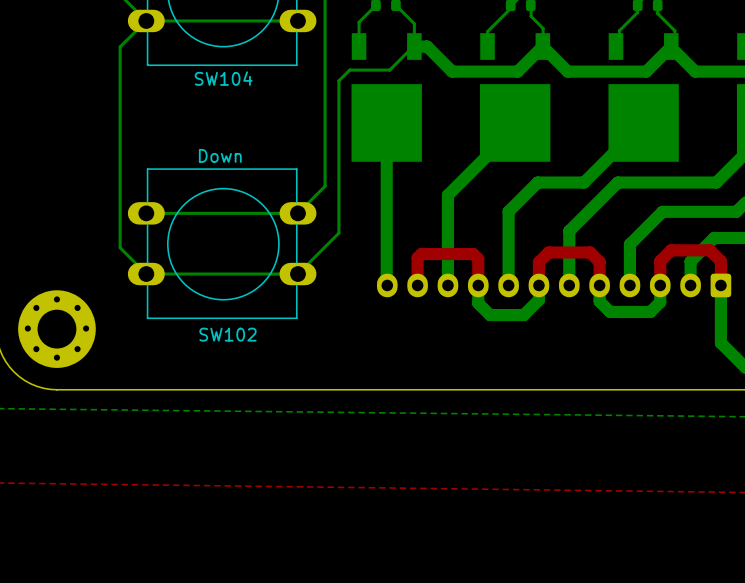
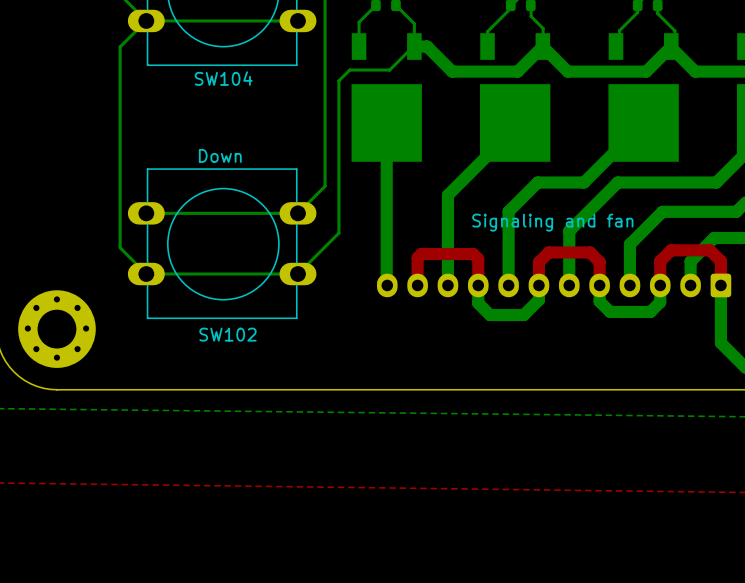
text: none -> Signaling and fan (552, 222)

